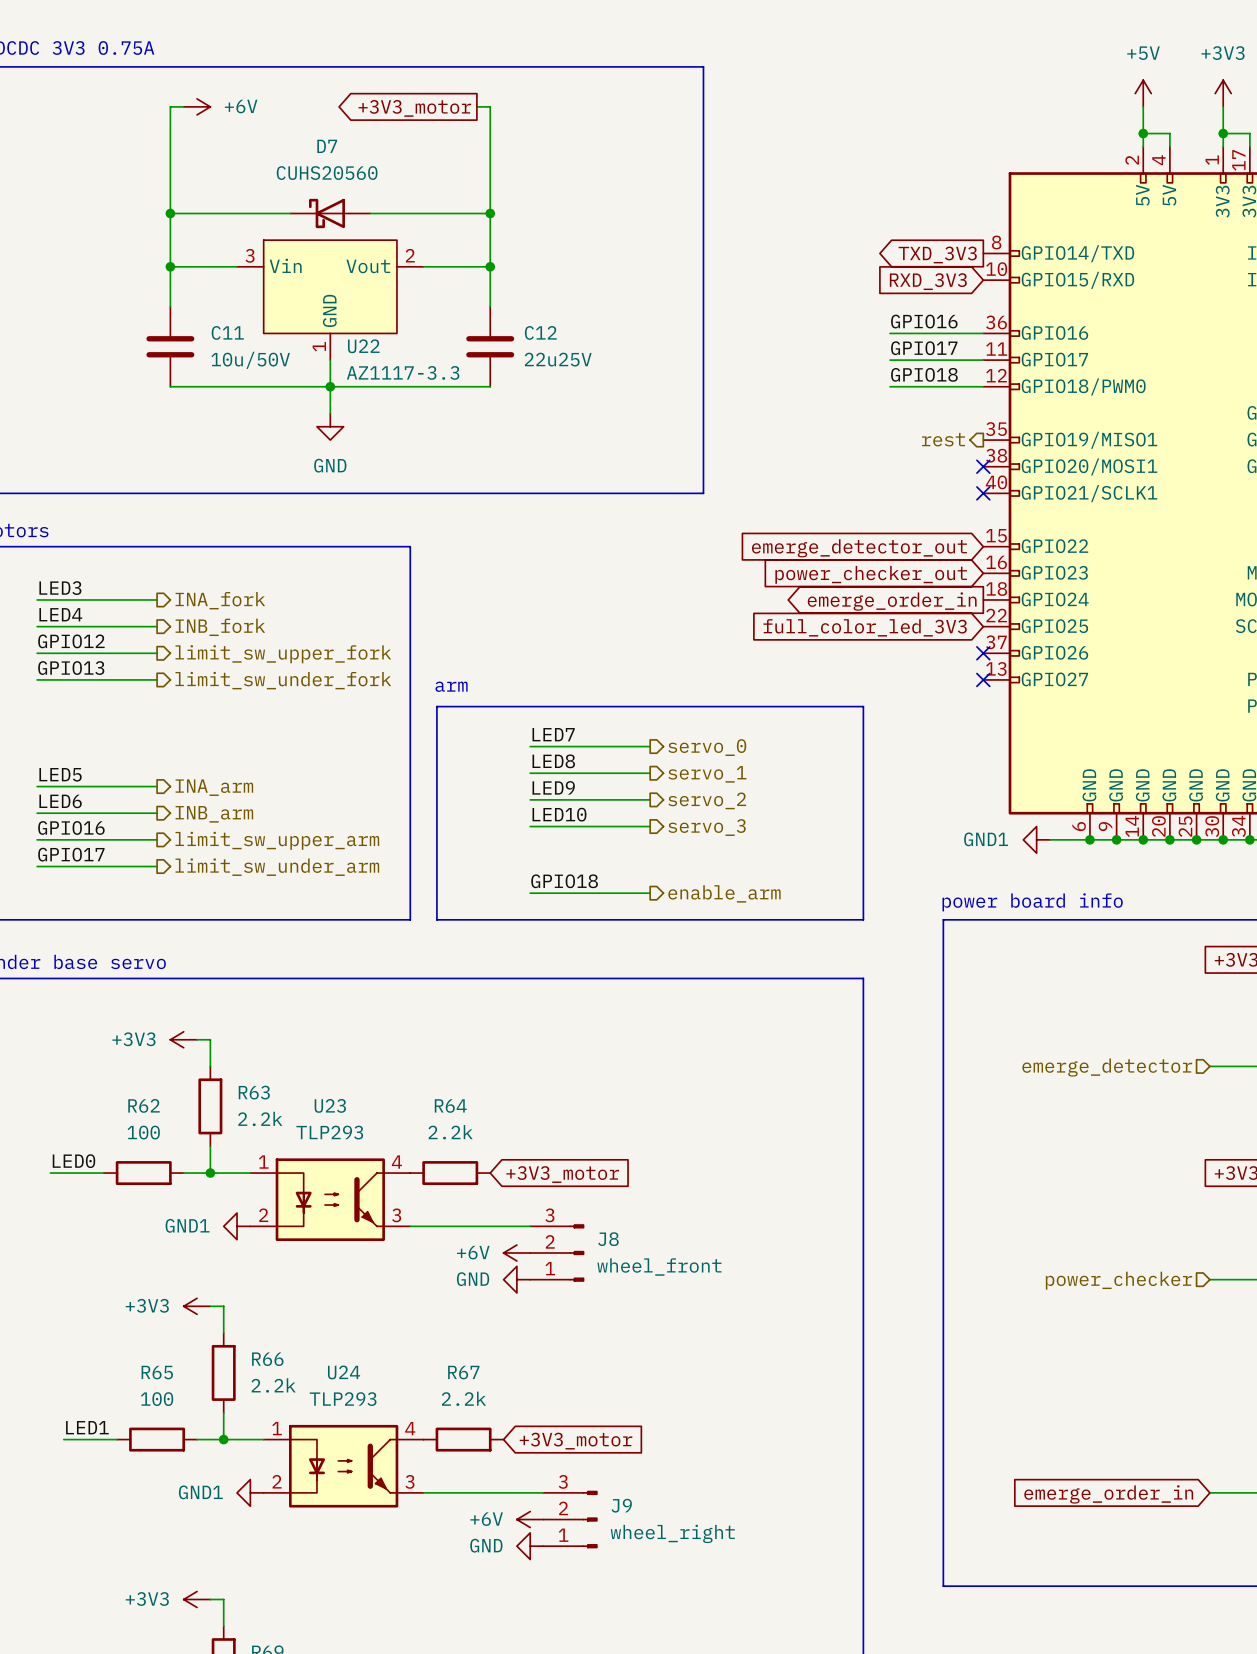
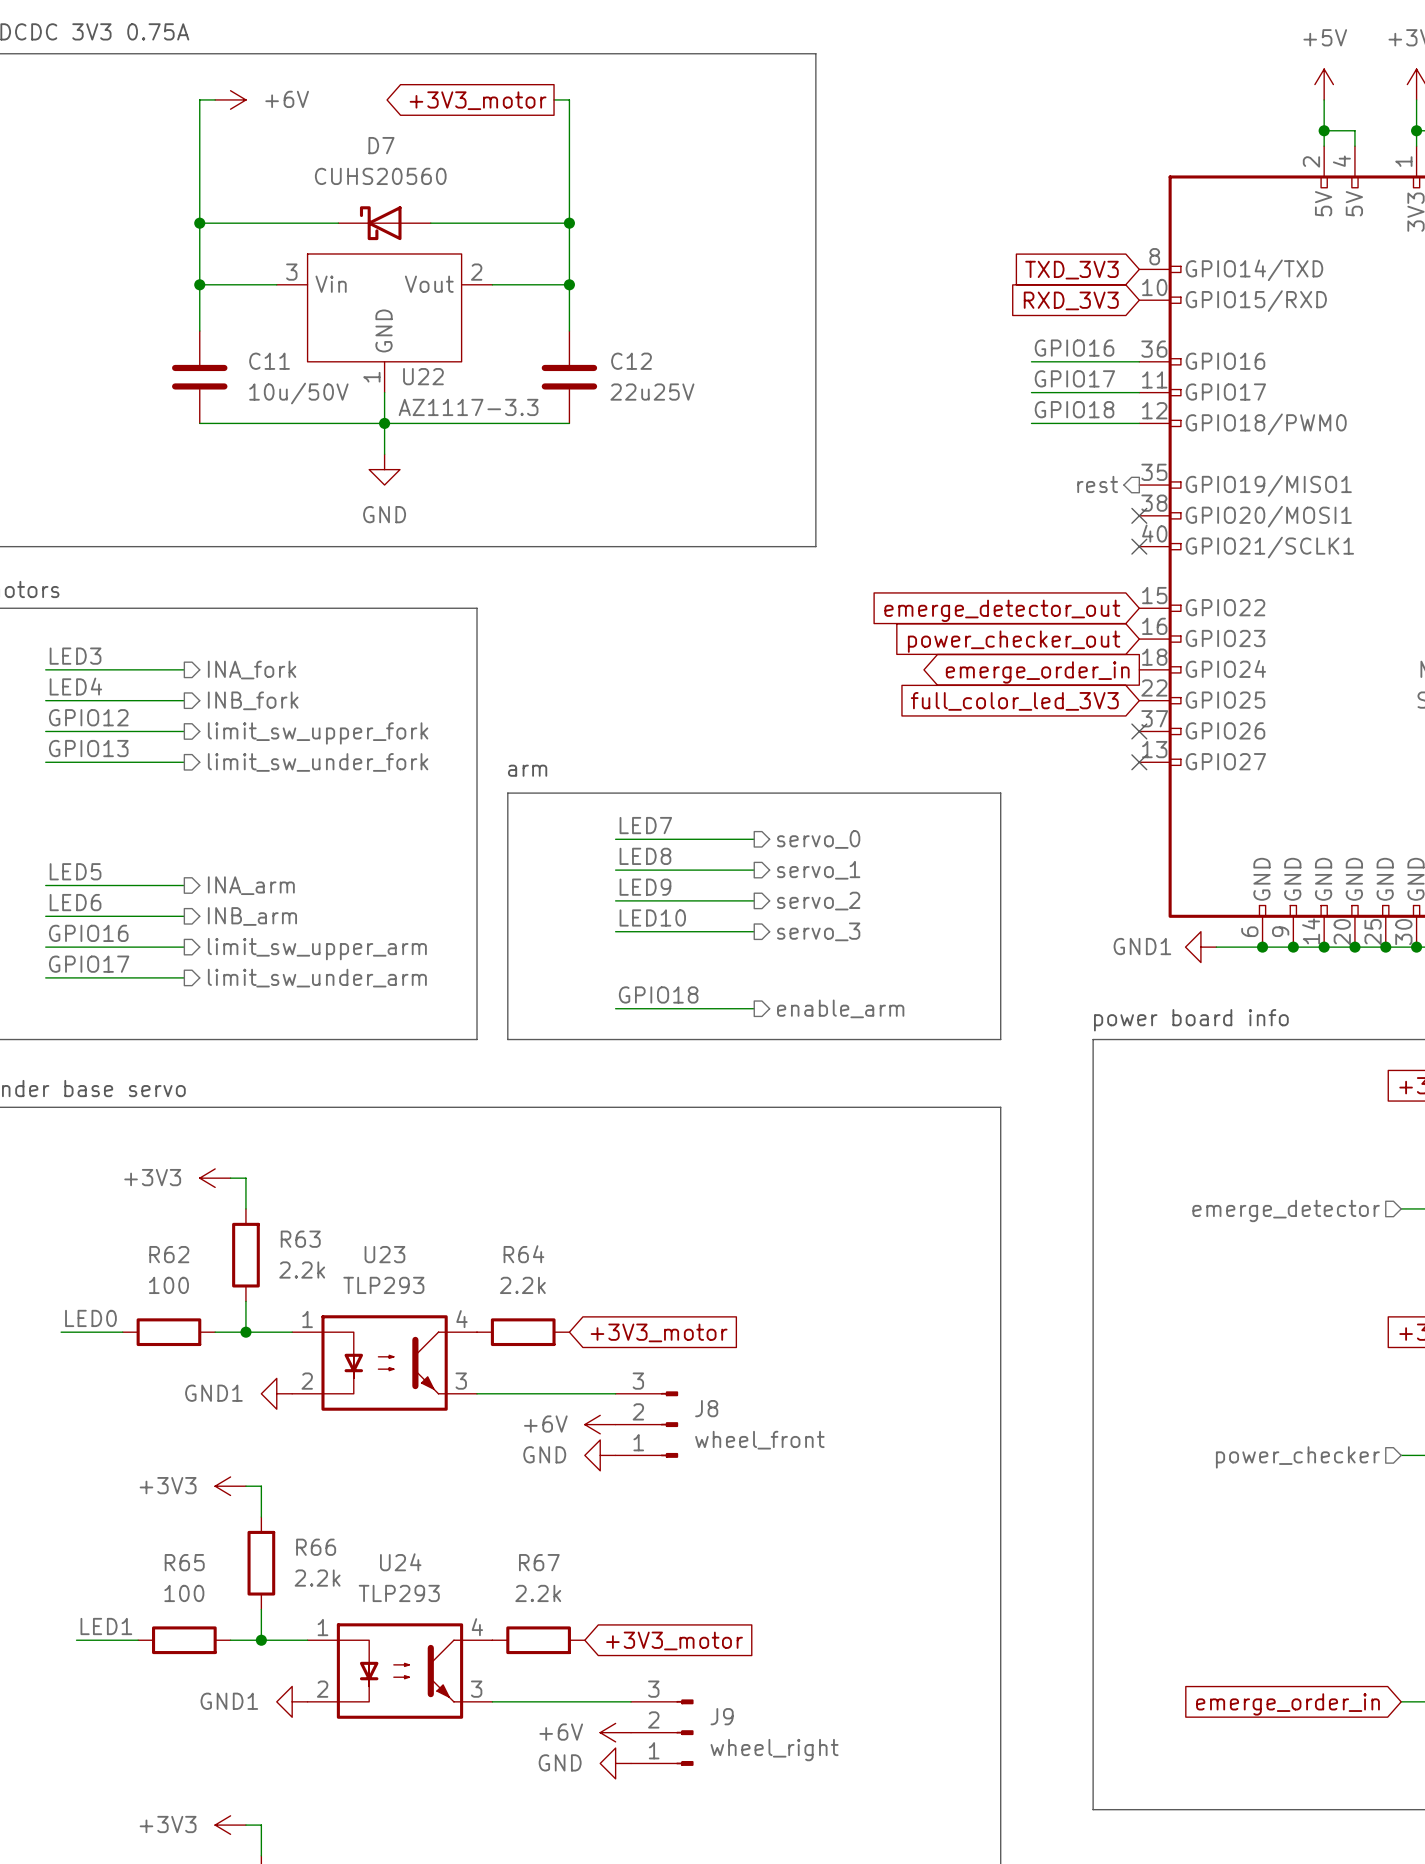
global label shape: output (937, 254) -> input (1072, 270)

